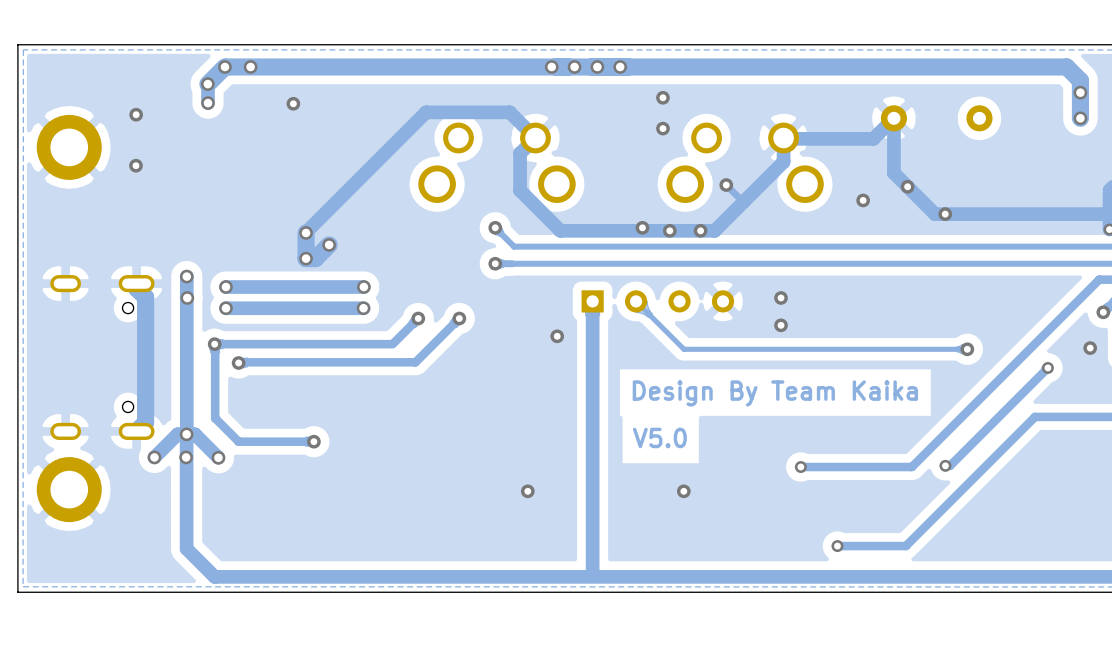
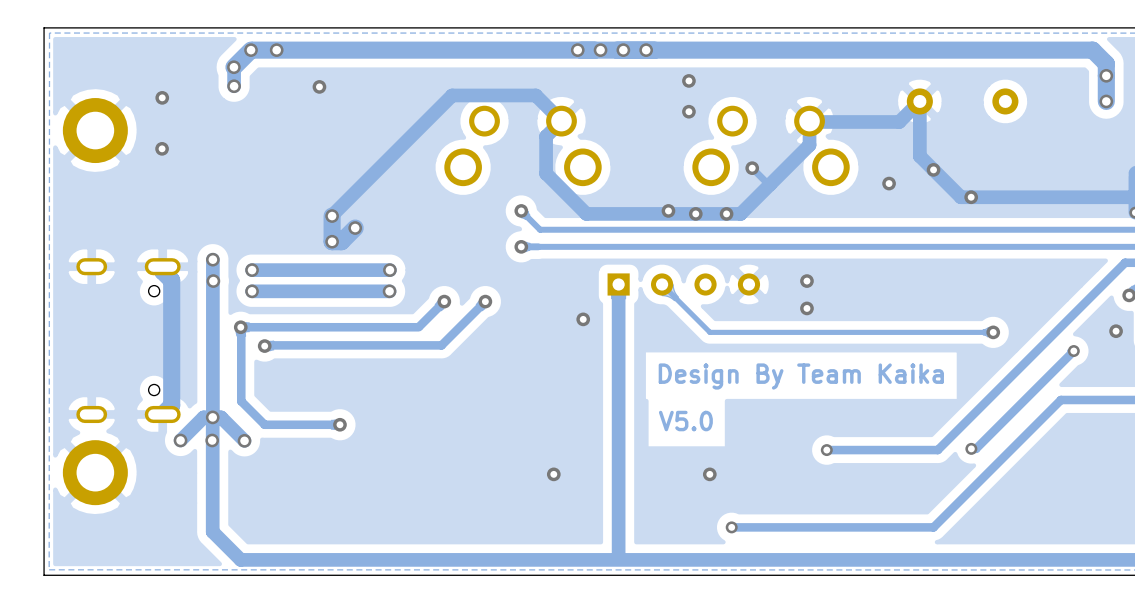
via: none -> (731, 527)
track: (907, 544) (905, 546) (837, 546) -> (933, 527) (731, 527)
via: (837, 546) -> none

